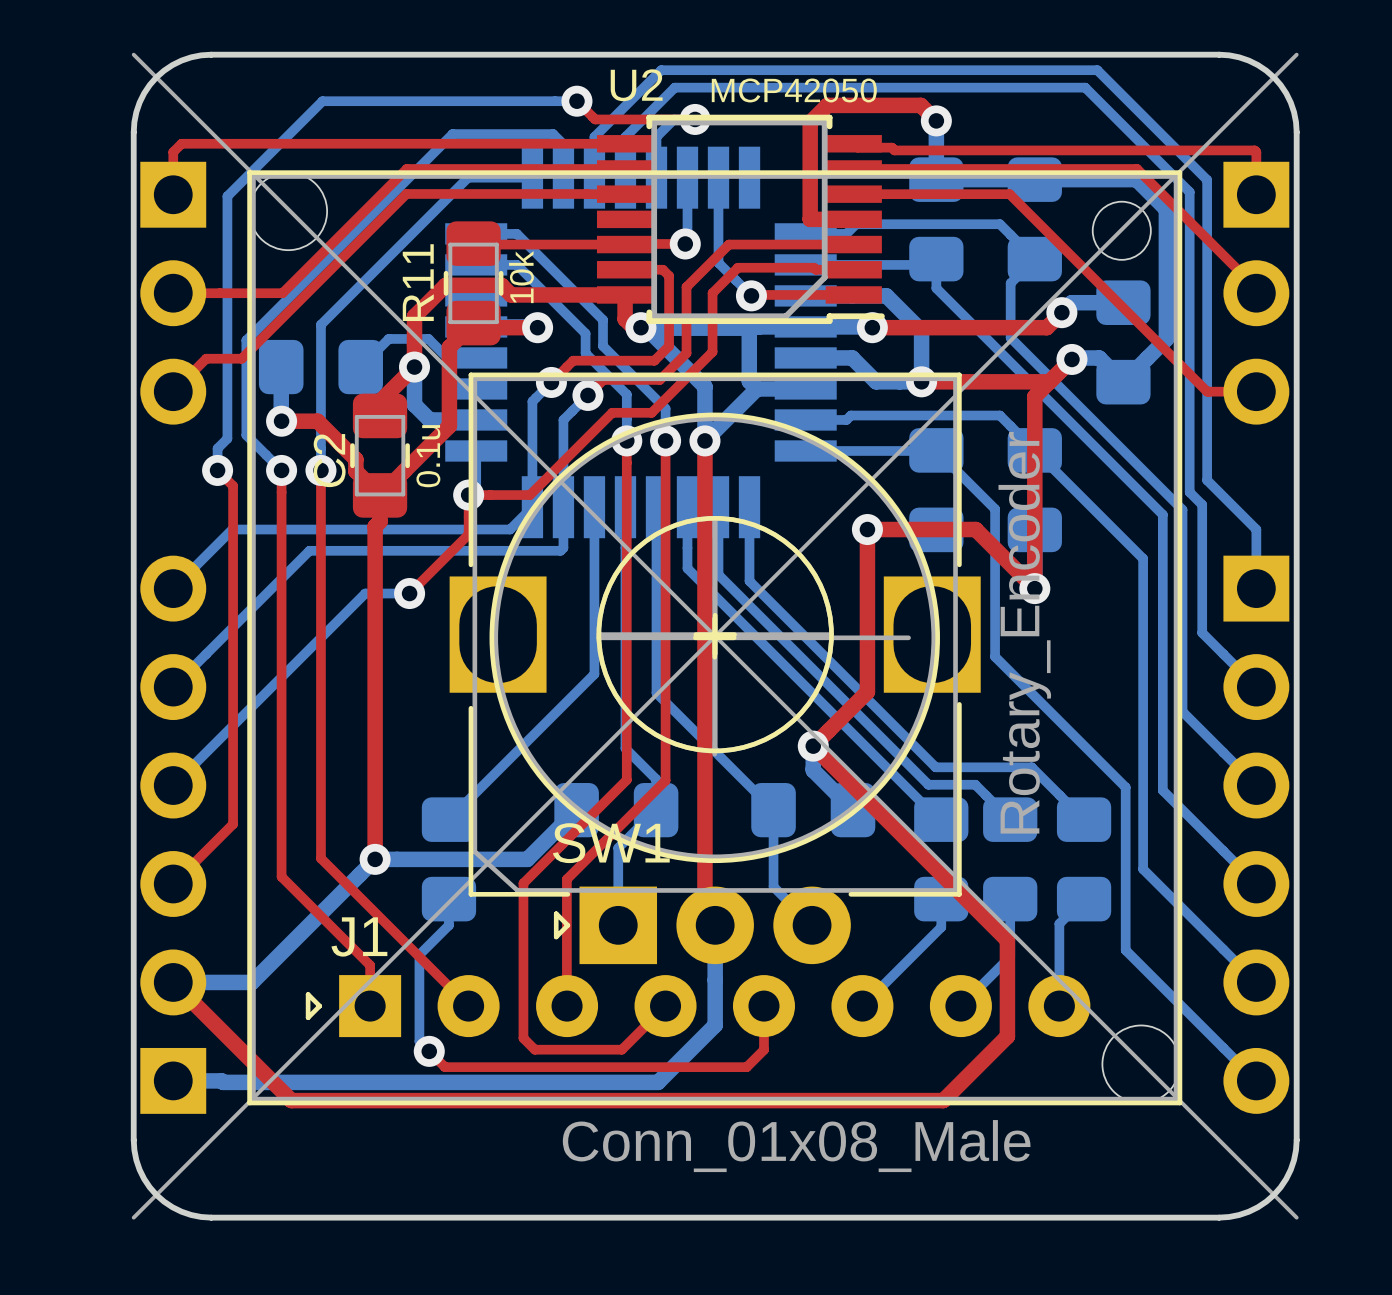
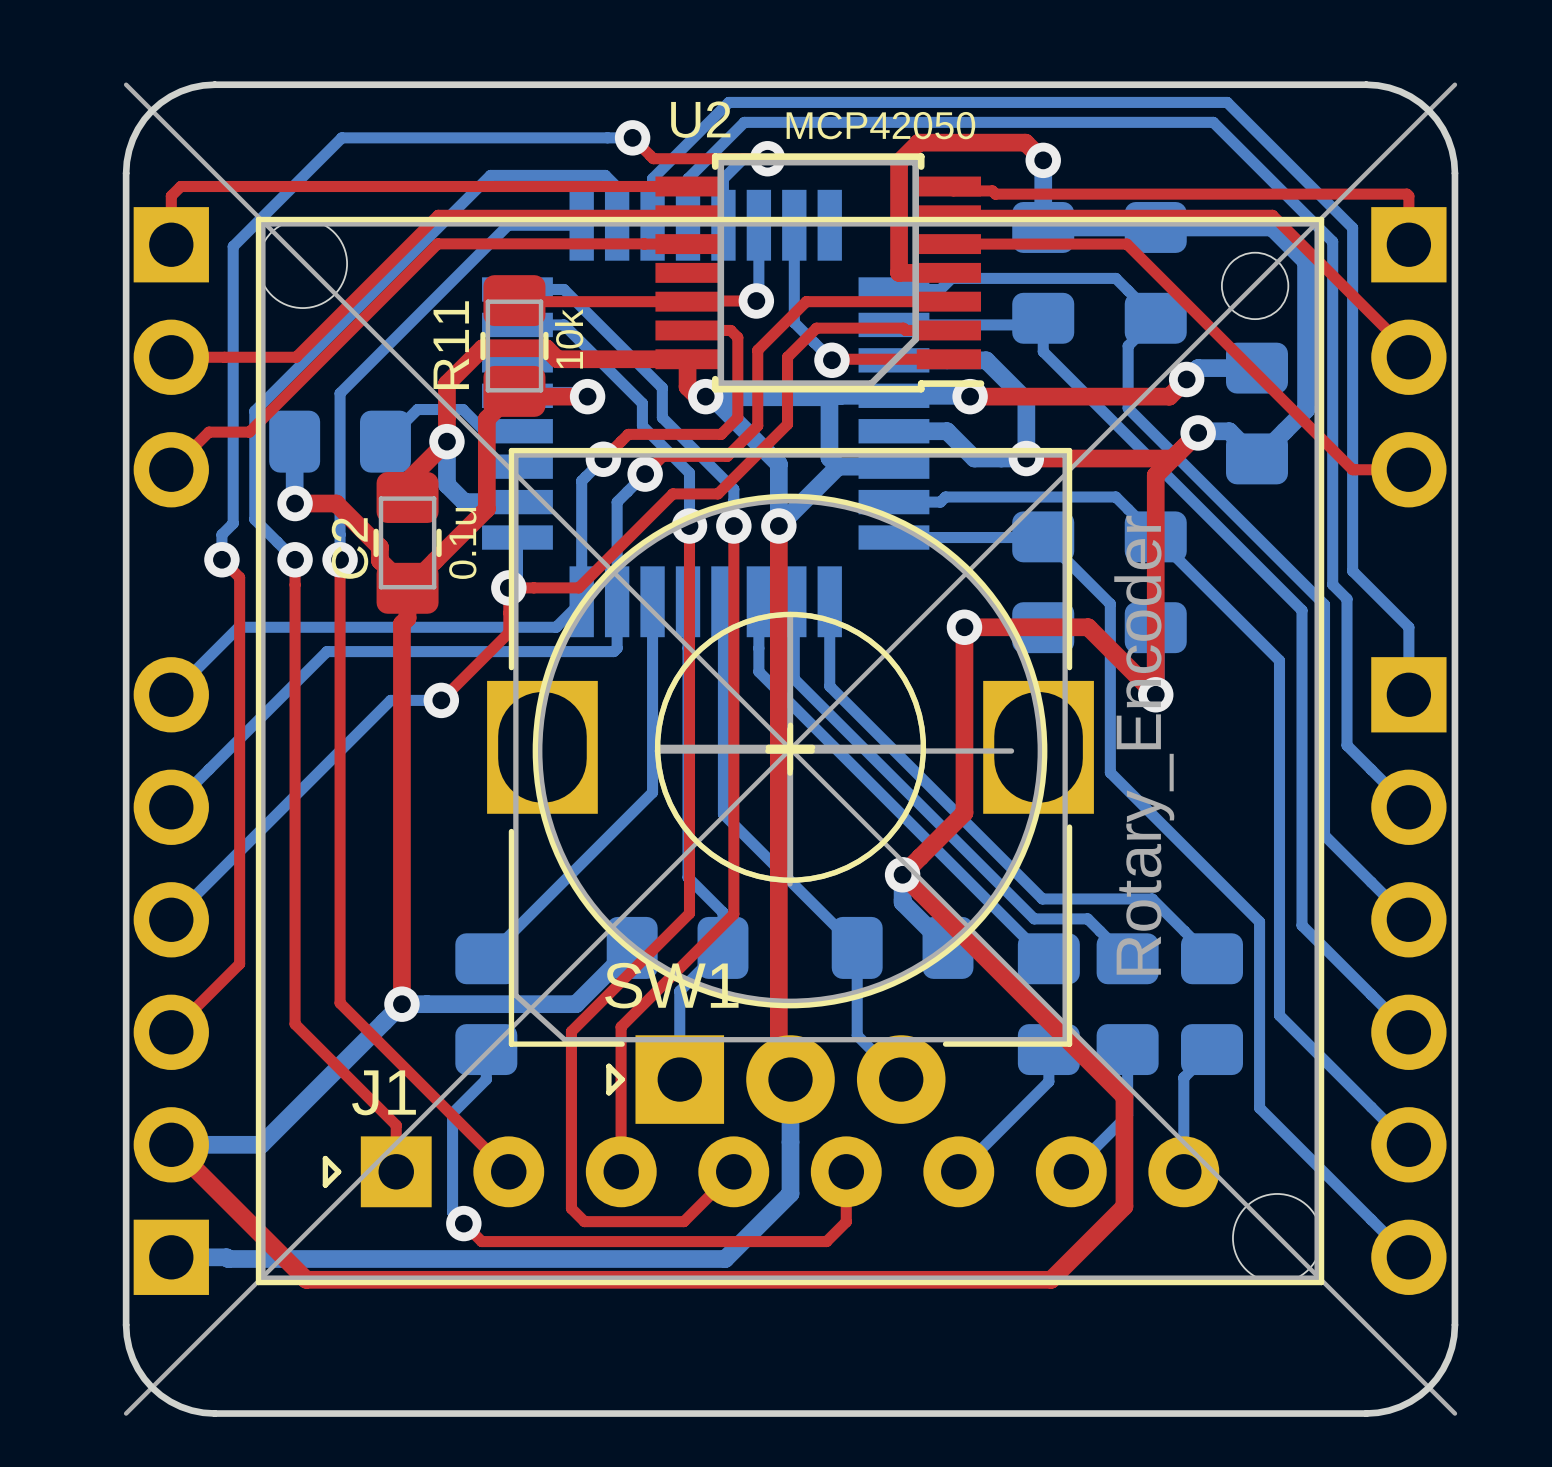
J1 value: Conn_01x08_Male (796, 1146) -> none

